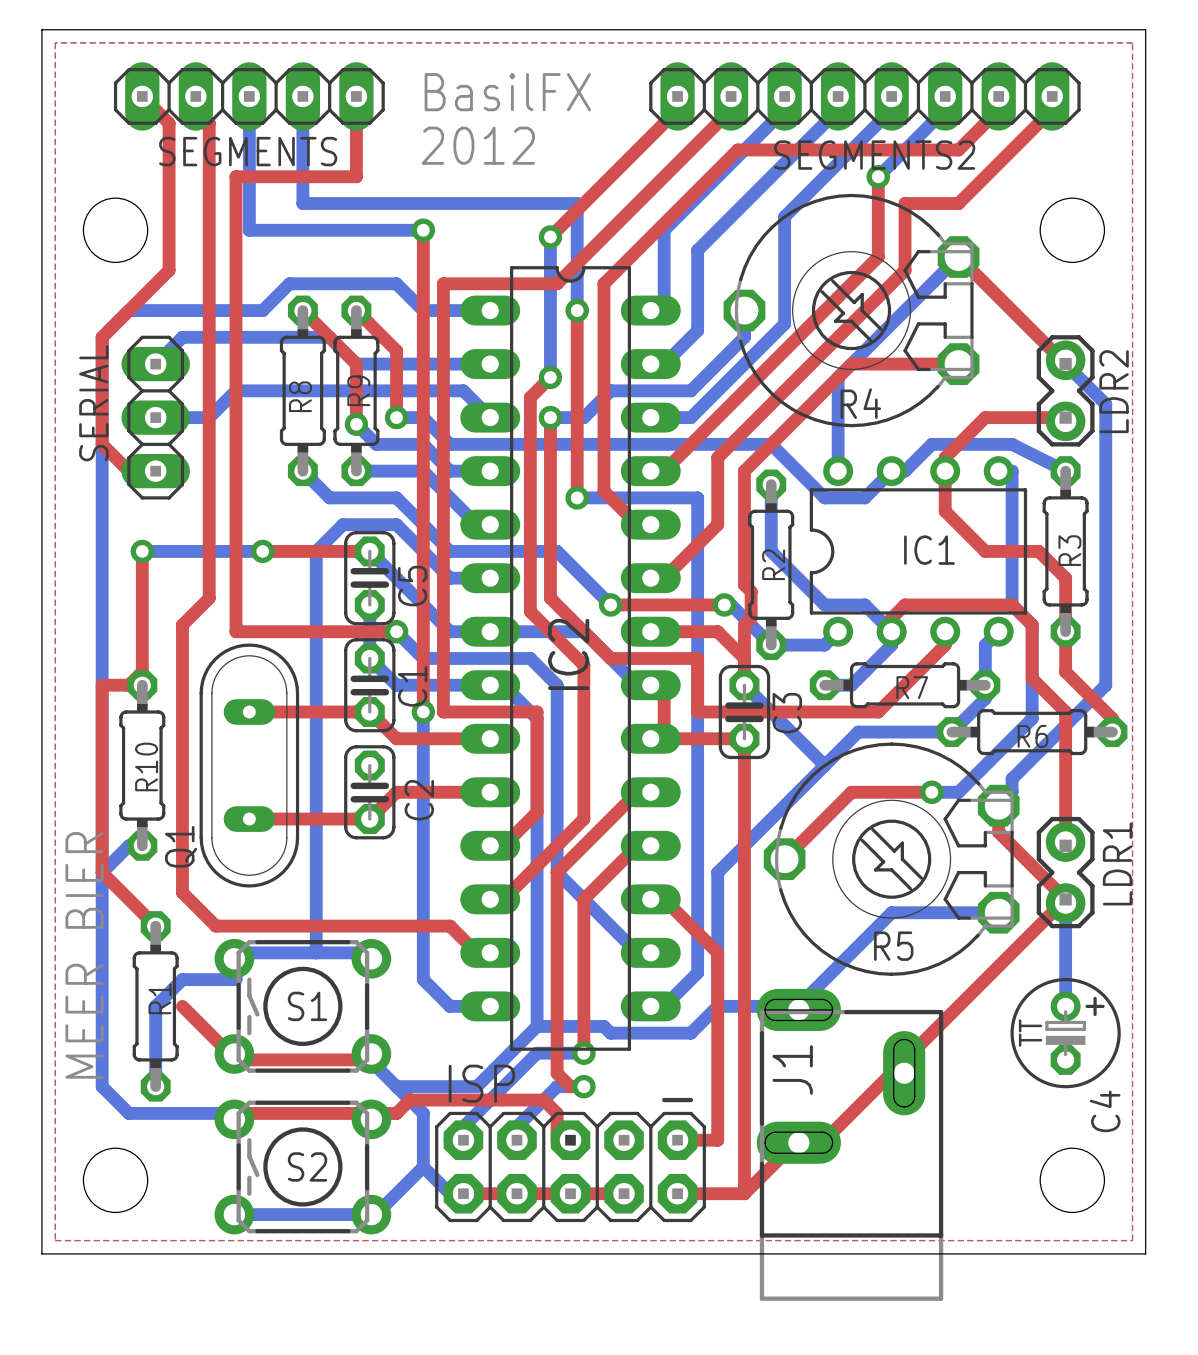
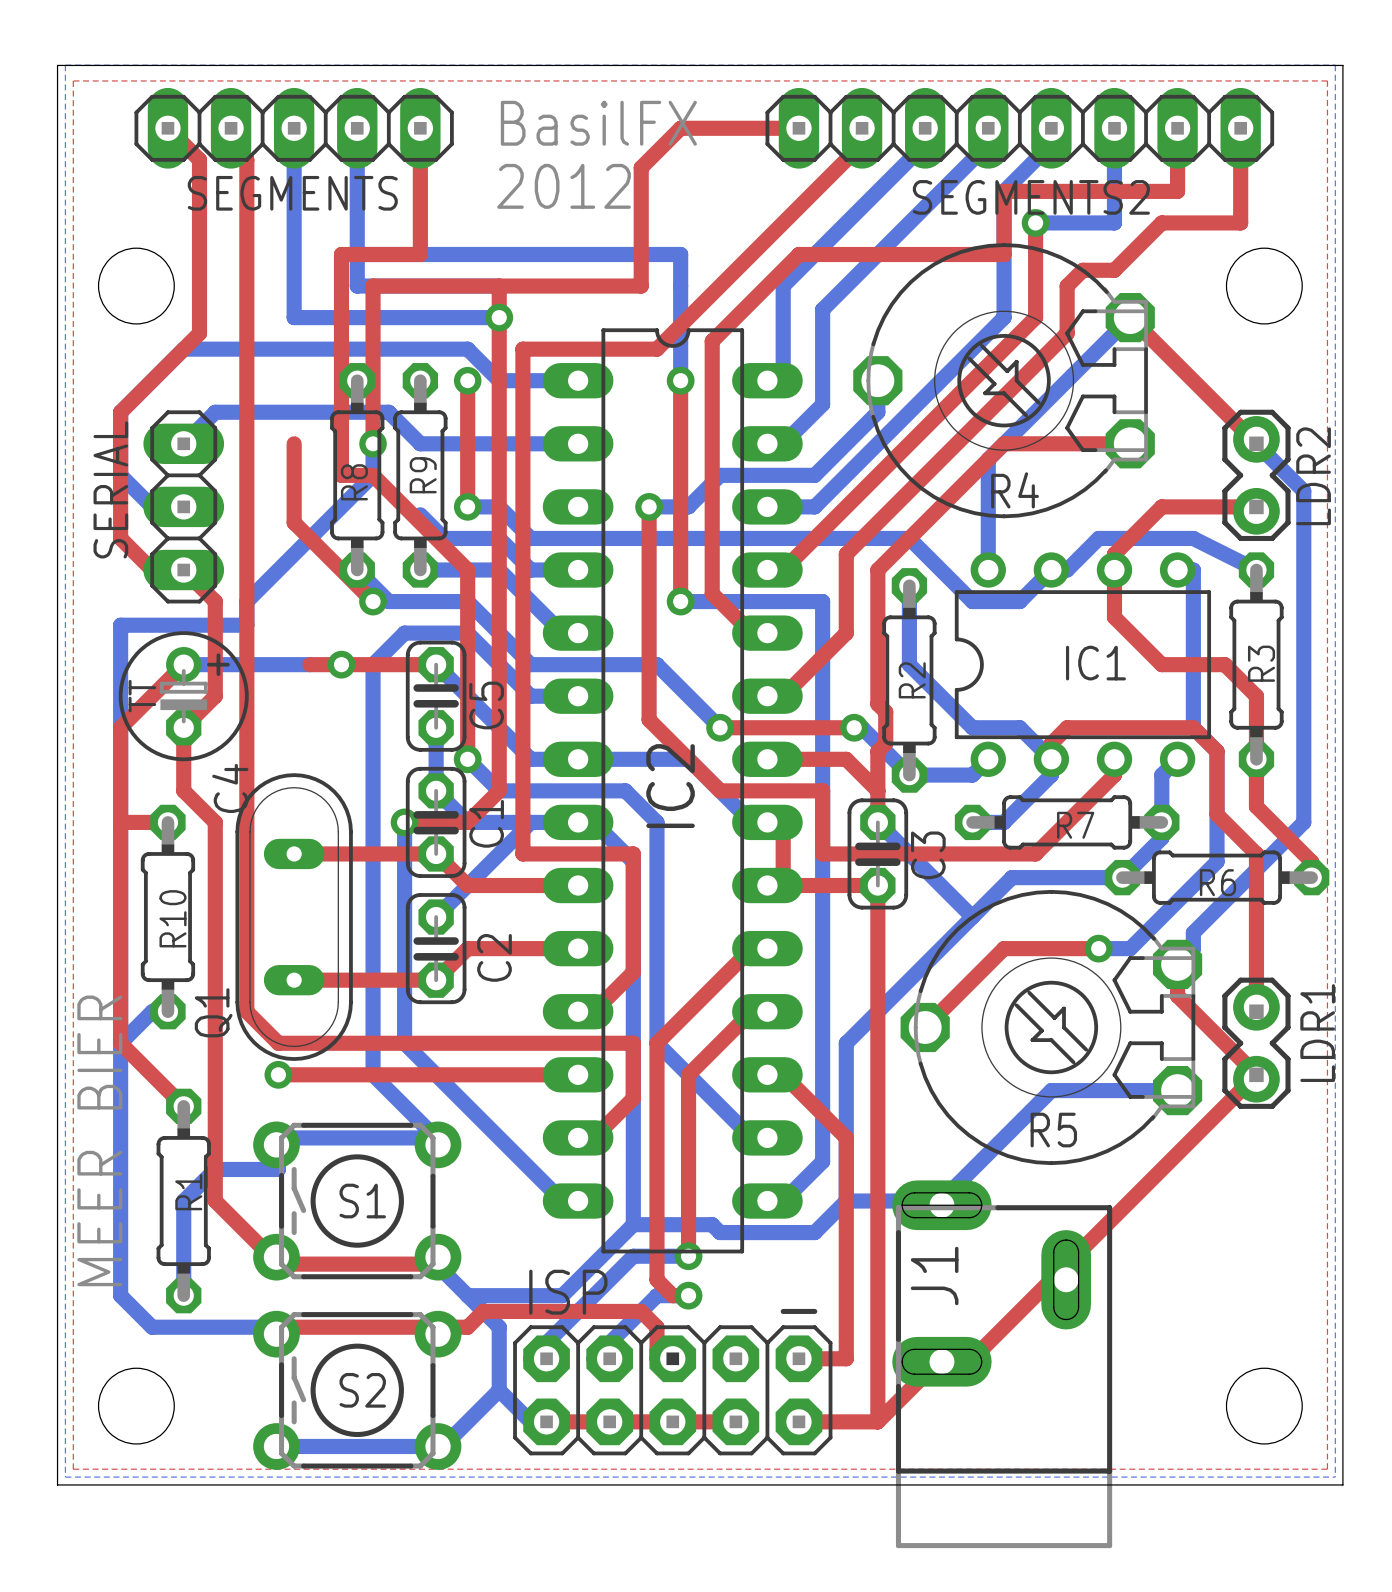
board edge: (41, 29) (1145, 29) (1145, 1253) (41, 1253) (41, 29) -> (57, 65) (57, 1484) (1342, 1484) (1342, 65) (57, 65)
top zone outline: (55, 42) (55, 1240) (1132, 1240) (1132, 42) (55, 42) -> (73, 80) (73, 1469) (1327, 1469) (1327, 80) (73, 80)
top track: (677, 96) (677, 109) (550, 236) -> (798, 128) (680, 128) (641, 167) (641, 286) (373, 286) (373, 443)
bottom track: (945, 109) (878, 176) -> (1114, 144) (1114, 222) (1035, 222)
top track: (998, 109) (958, 149) -> (1177, 144) (1177, 191) (1130, 191)
top track: (1052, 109) (985, 176) -> (1240, 144) (1240, 222) (1161, 222)
top track: (851, 149) (737, 149) (603, 283) -> (1004, 191) (1004, 254) (798, 254) (712, 341) (712, 349)
bottom track: (851, 149) (784, 216) (784, 323) -> (1004, 191) (1004, 317) (925, 396)
top track: (356, 176) (235, 176) (235, 631) (396, 631) -> (420, 222) (420, 254) (341, 254) (341, 475) (373, 475) (467, 570) (467, 759)
top track: (958, 203) (905, 203) (905, 230) -> (1130, 254) (1114, 270) (1082, 270) (1067, 286)
bottom track: (249, 230) (302, 230) -> (357, 254) (357, 286)
bottom track: none -> (294, 286) (294, 317) (499, 317)
via position: (423, 230) -> (499, 317)
bottom track: (550, 236) (550, 377) -> none
via: (550, 236) -> none
bottom track: (289, 283) (262, 310) (128, 310) -> (341, 349) (183, 349) (152, 380)
top track: (302, 310) (356, 364) (356, 424) -> none
top track: (356, 310) (396, 350) -> (467, 380) (467, 428)
via: none -> (467, 380)
top track: none -> (294, 443) (294, 522) (373, 601)
bottom track: none -> (373, 443) (373, 475) (246, 601) (246, 625) (120, 625)
via: none -> (373, 443)
top track: (550, 377) (530, 397) (530, 611) (583, 665) (583, 819) (503, 899) (490, 899) -> (278, 1074) (578, 1074)
via: (550, 377) -> none
bottom track: (102, 390) (102, 517) -> (120, 475) (152, 506)
bottom track: (155, 417) (209, 417) (235, 390) (463, 390) (490, 417) -> none
via: (356, 424) -> none
via: none -> (373, 601)
top track: (142, 551) (142, 671) (128, 685) -> none
via: (142, 551) -> none
top track: none -> (183, 664) (120, 727) (120, 822)
via: (262, 551) -> none
via: none -> (341, 664)
top track: (209, 598) (182, 625) (182, 685) -> (183, 570) (215, 601) (215, 696) (183, 727) (183, 790) (215, 822)
top track: none -> (246, 719) (246, 1011) (278, 1043) (633, 1043) (633, 1098) (593, 1137)
top track: (423, 658) (423, 712) -> (499, 790) (467, 822) (404, 822)
via: none -> (404, 822)
bottom track: none -> (530, 822) (436, 917)
bottom track: (423, 712) (423, 979) (450, 1006) (476, 1006) -> (404, 822) (404, 1043) (562, 1201)
via: (423, 712) -> none
top track: (182, 892) (215, 926) (450, 926) (476, 952) (490, 952) -> (215, 1066) (215, 1201)
via: none -> (278, 1074)
bottom track: (316, 899) (316, 952) -> (373, 1074) (436, 1137)
bottom track: (1065, 903) (1065, 1006) -> none
C4 position: (1065, 1033) -> (183, 696)

